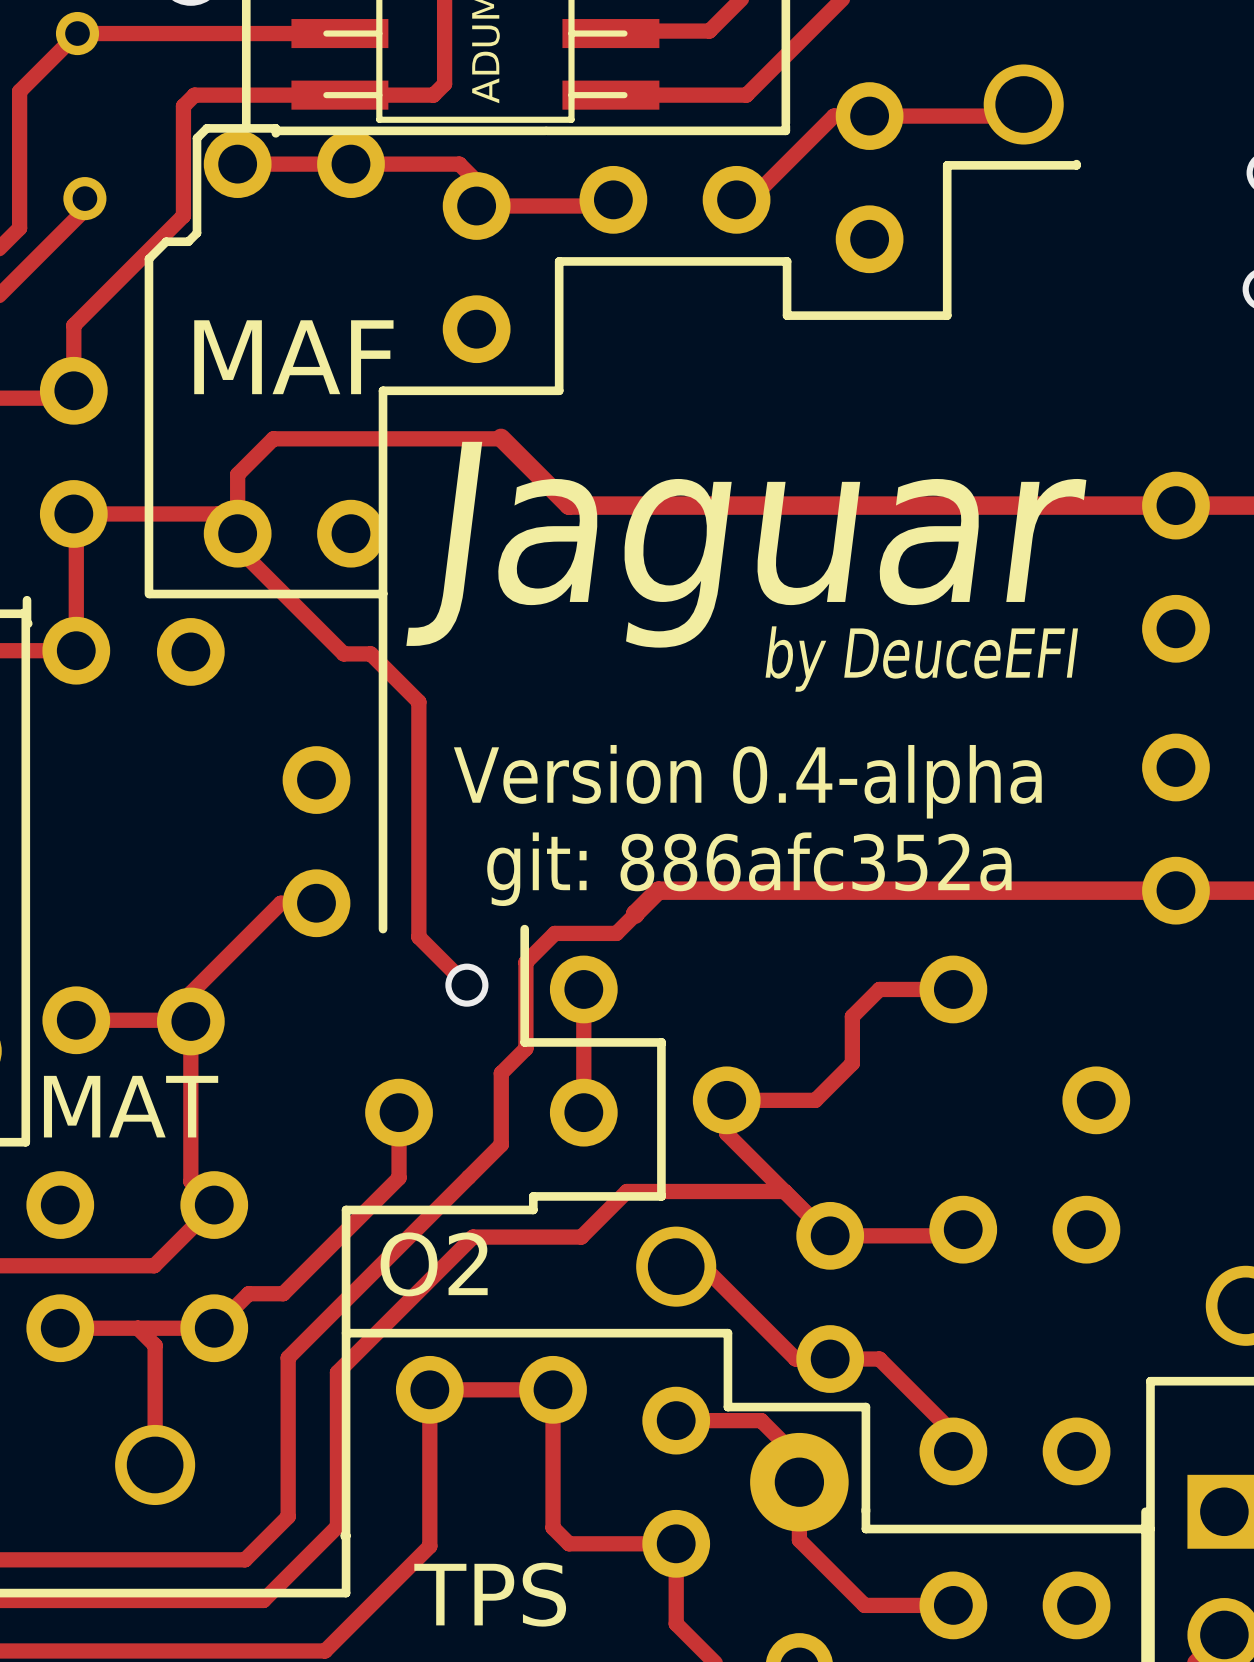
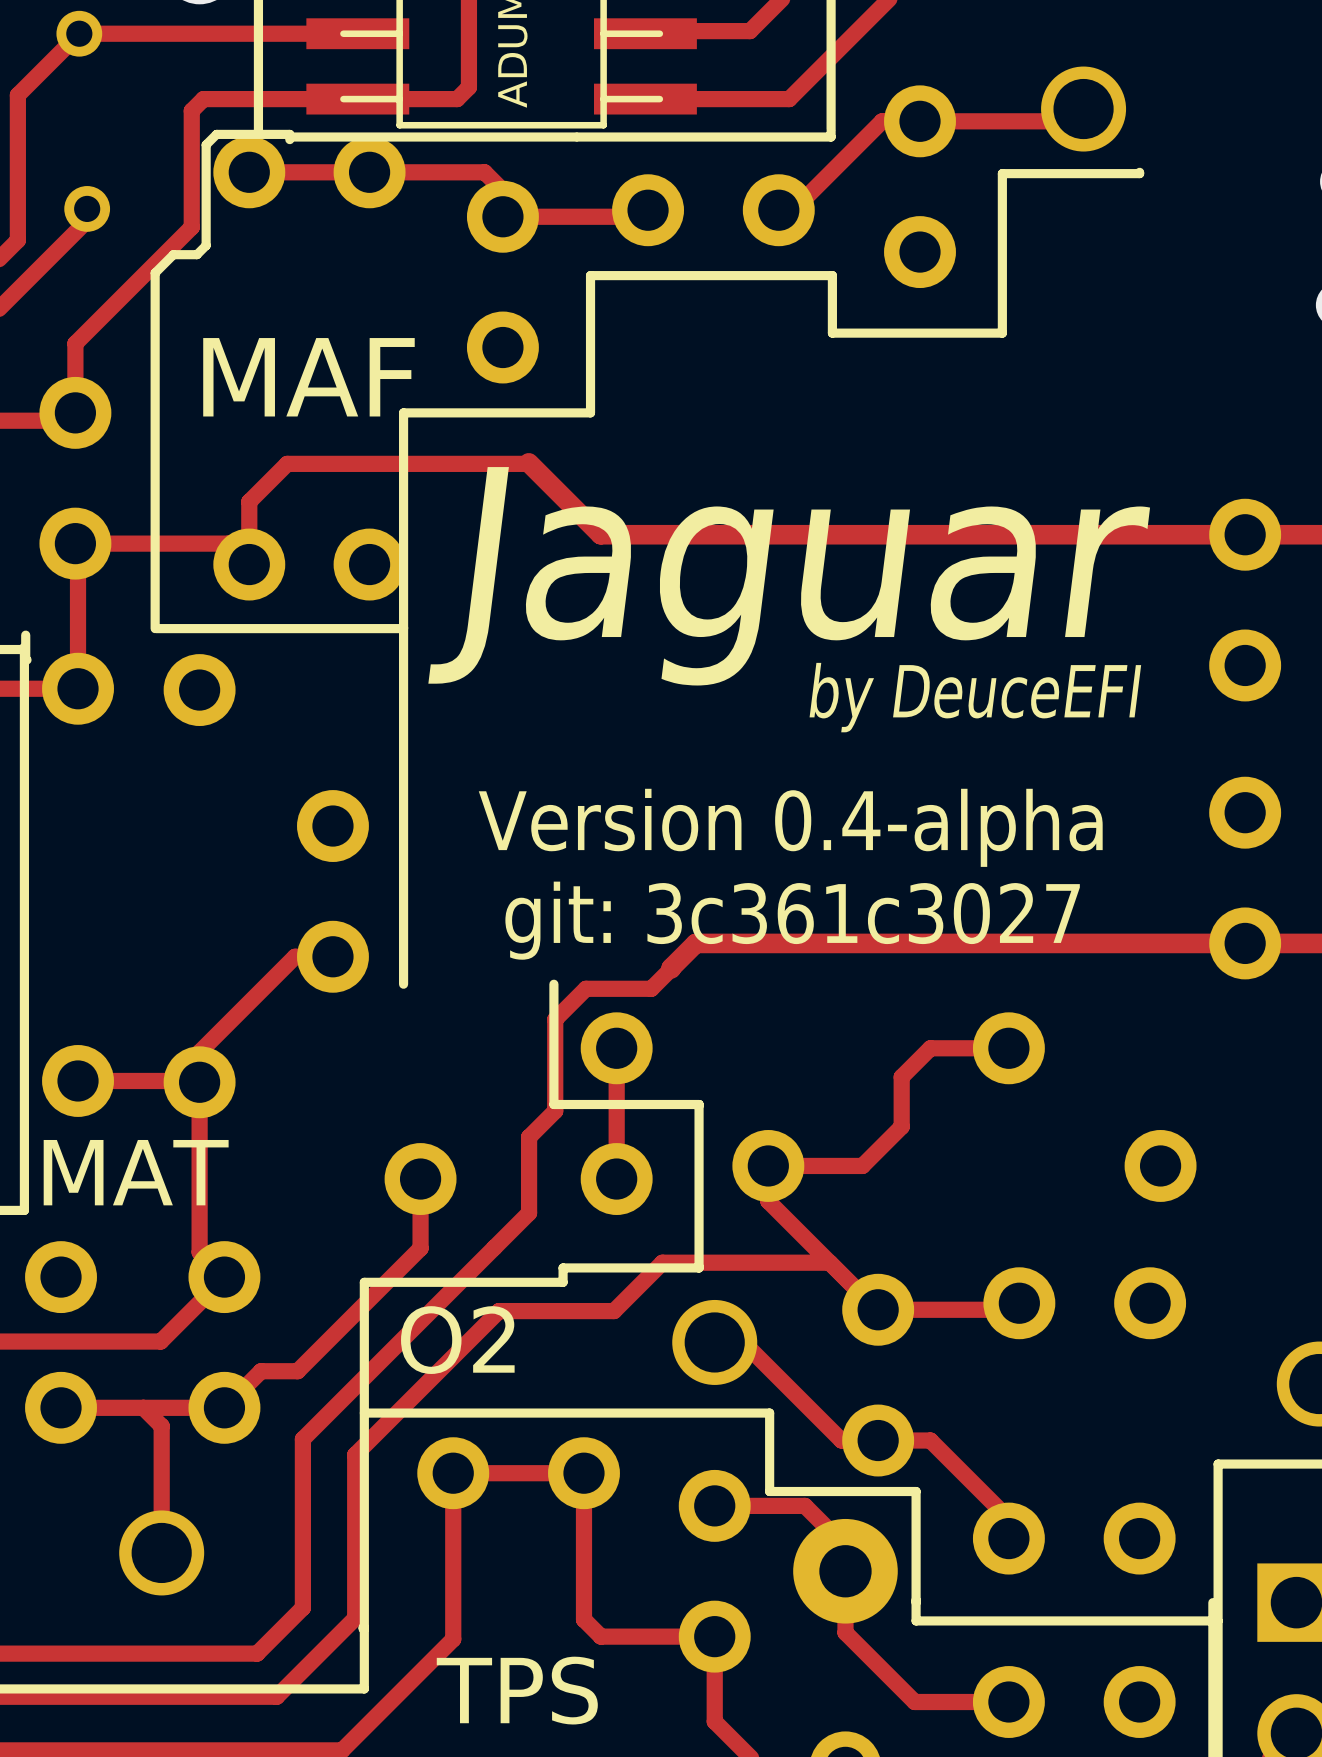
track: (237, 533) (237, 547) (343, 653) (370, 653) (418, 701) (418, 937) (466, 985) -> none
text: git: 886afc352a (749, 869) -> git: 3c361c3027 (792, 920)
via: (466, 985) -> none

